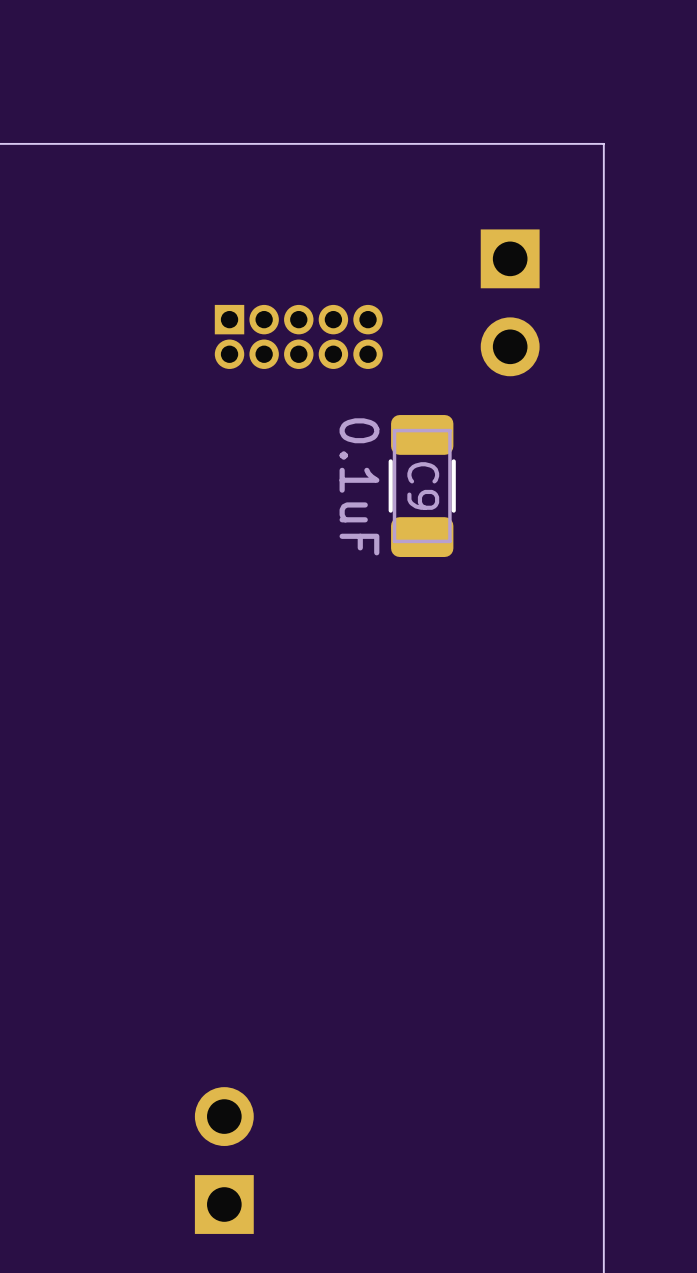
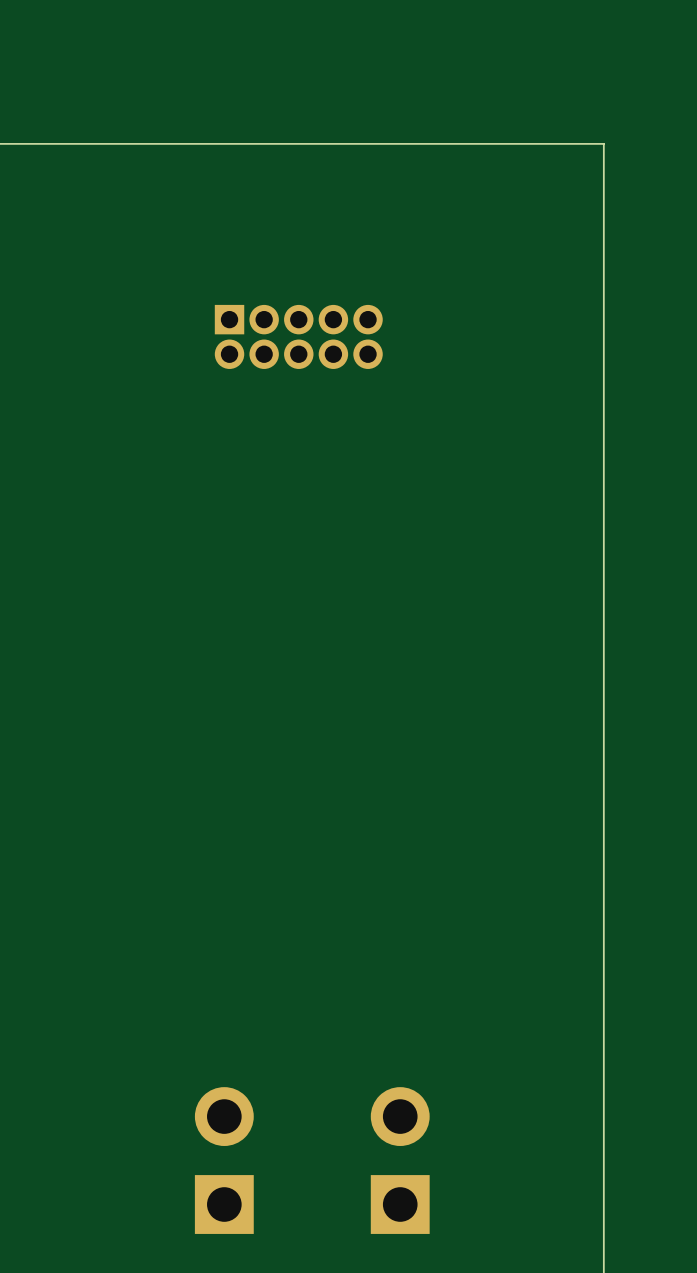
part rotation: 0° (510, 302) -> 180° (400, 1160)
part position: (510, 302) -> (400, 1160)
C9: 0.1uF (422, 486) -> none

